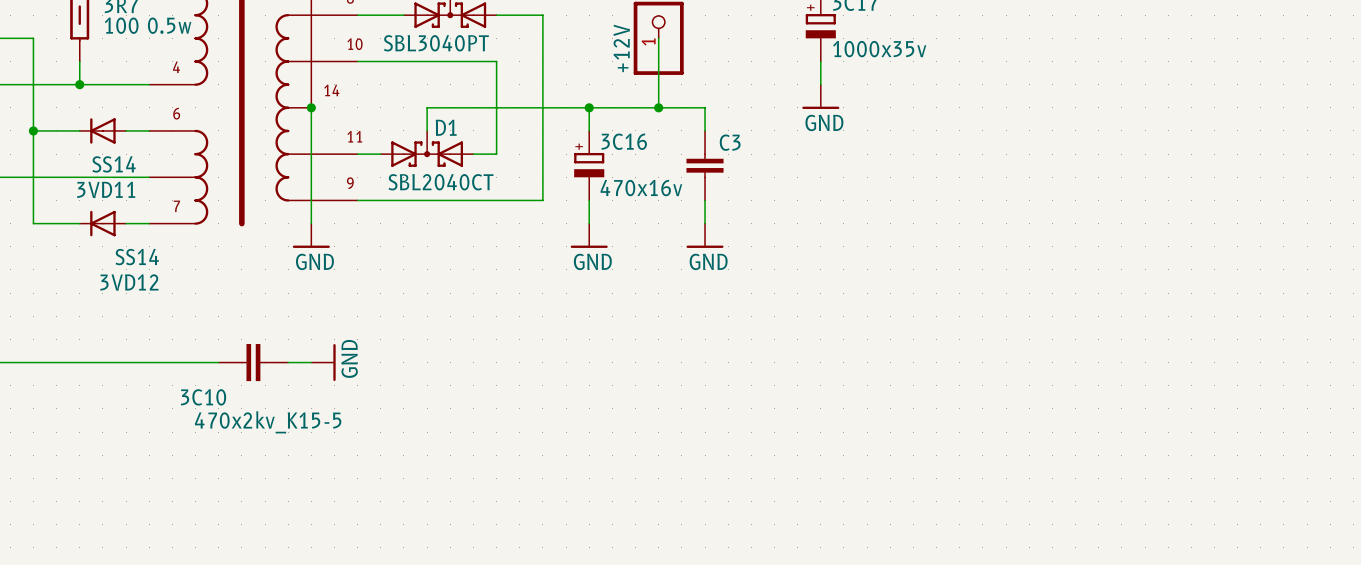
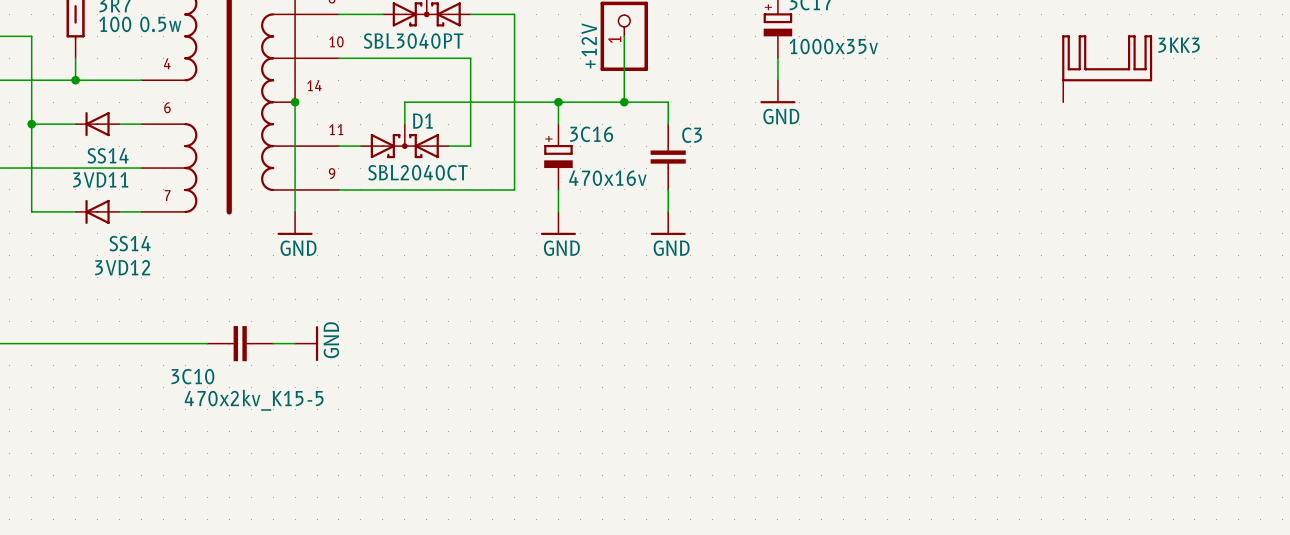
3KK3: none -> (1107, 68)

